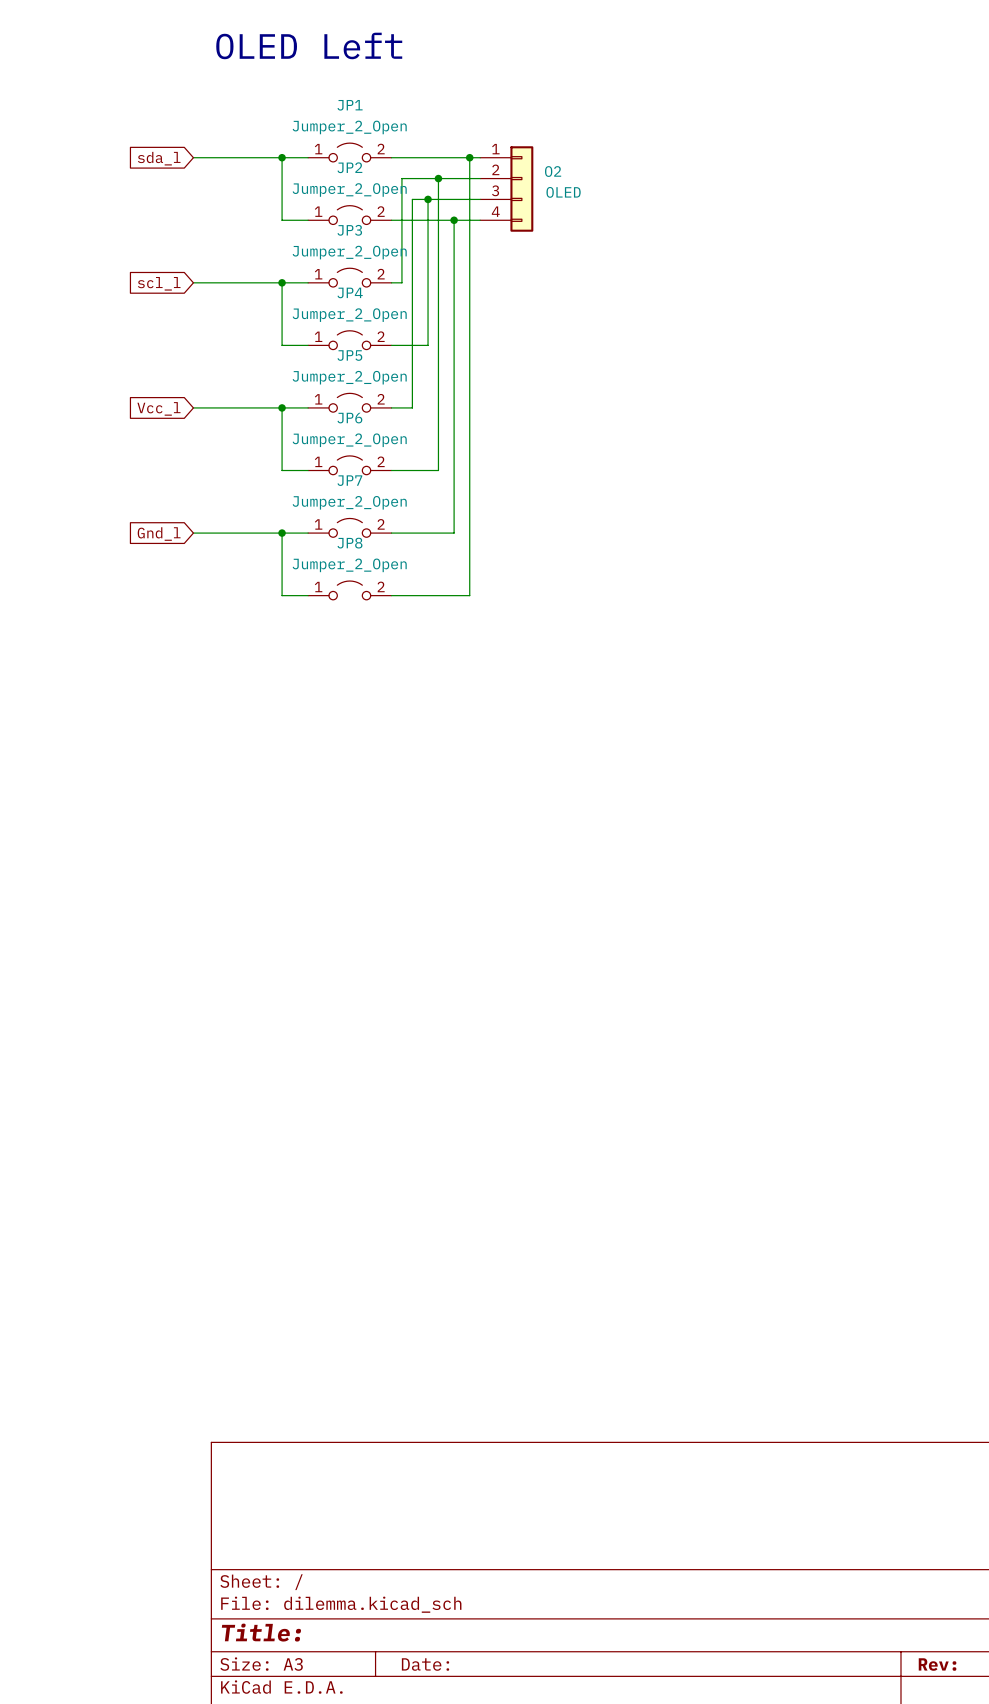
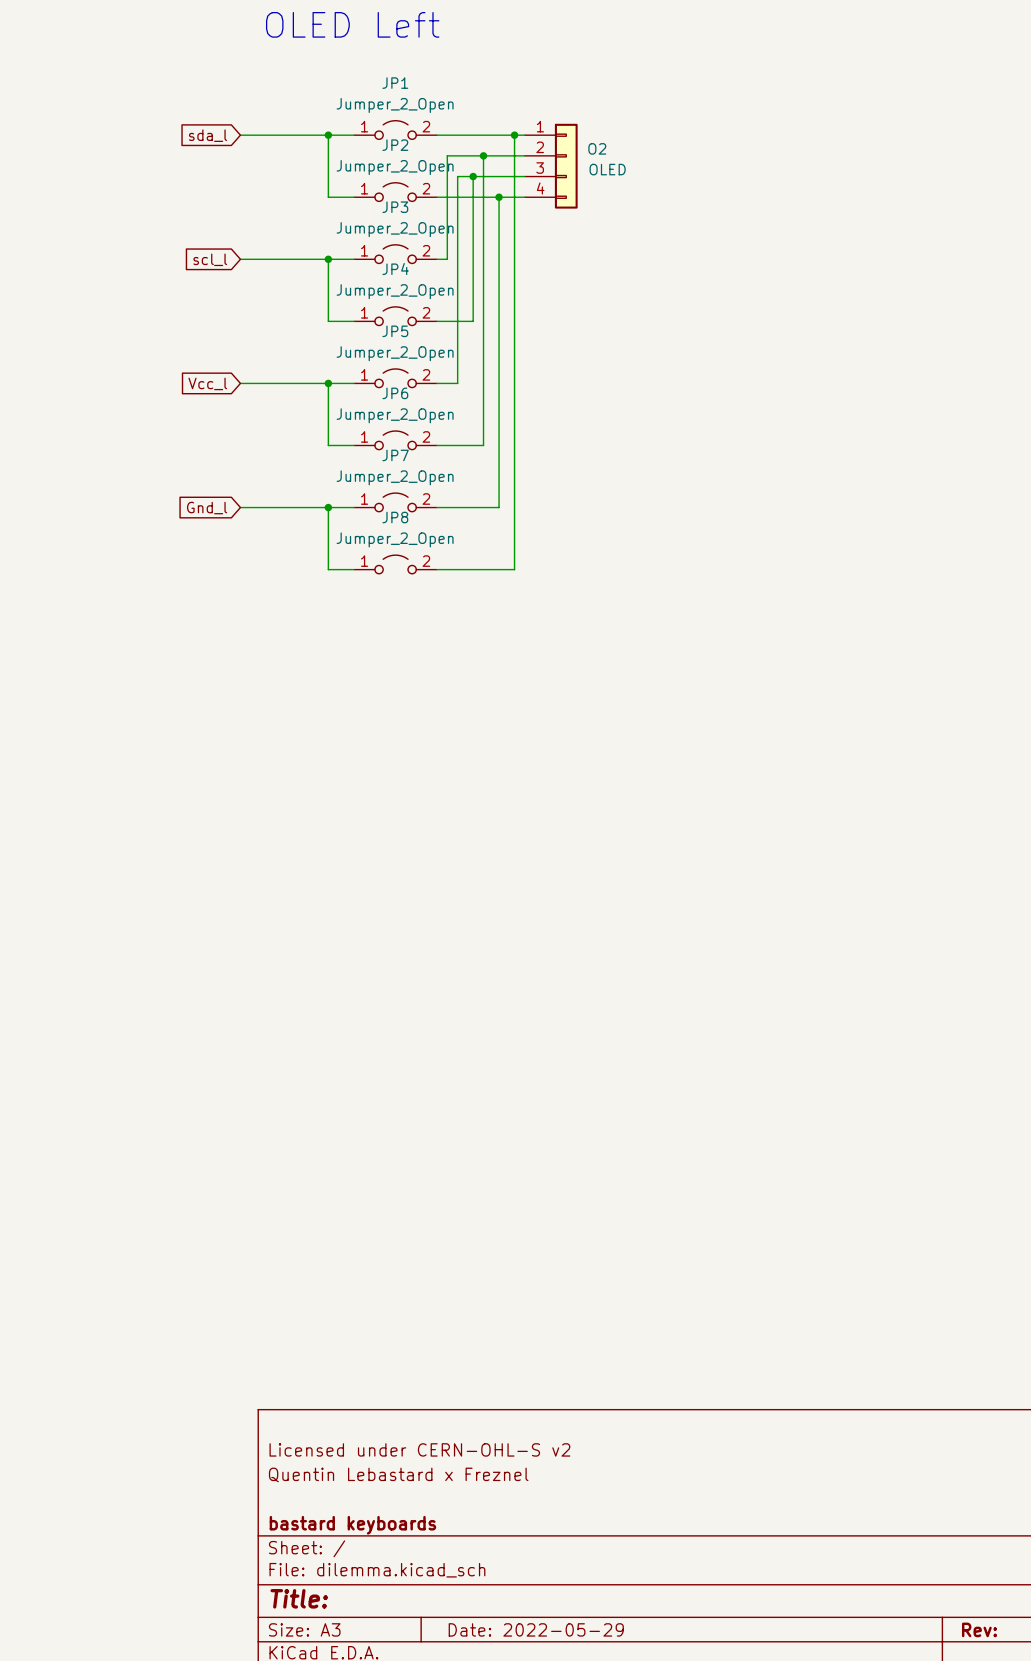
title block: none -> Licensed under CERN-OHL-S v2 (419, 1449)
title block: none -> Quentin Lebastard x Freznel (398, 1474)
title block: none -> bastard keyboards (352, 1525)
title block: Date: (425, 1664) -> Date: 2022-05-29 (536, 1629)

